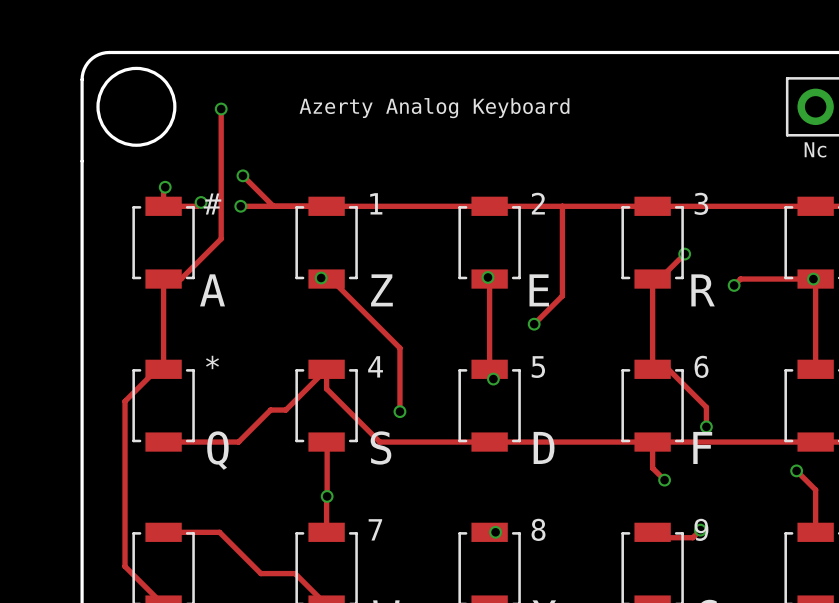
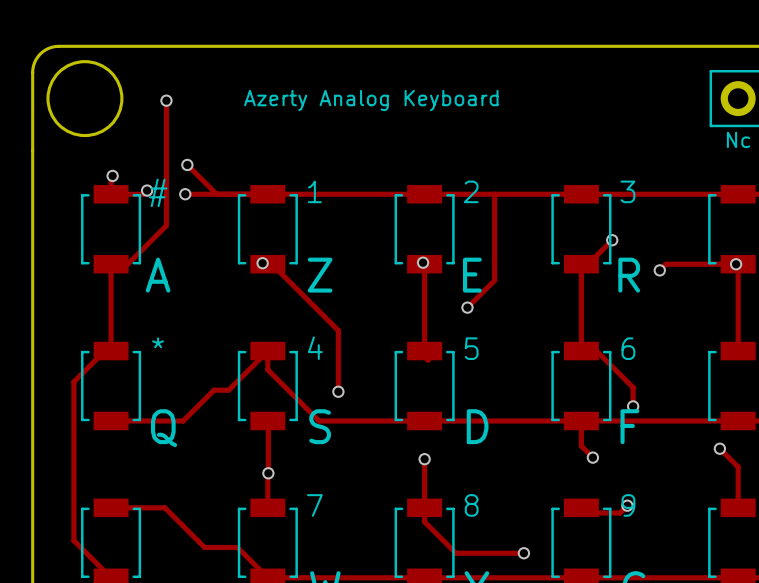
via: (493, 379) -> none
track: none -> (424, 459) (424, 521) (455, 553) (523, 553)
via position: (495, 532) -> (424, 459)
via: none -> (523, 553)

